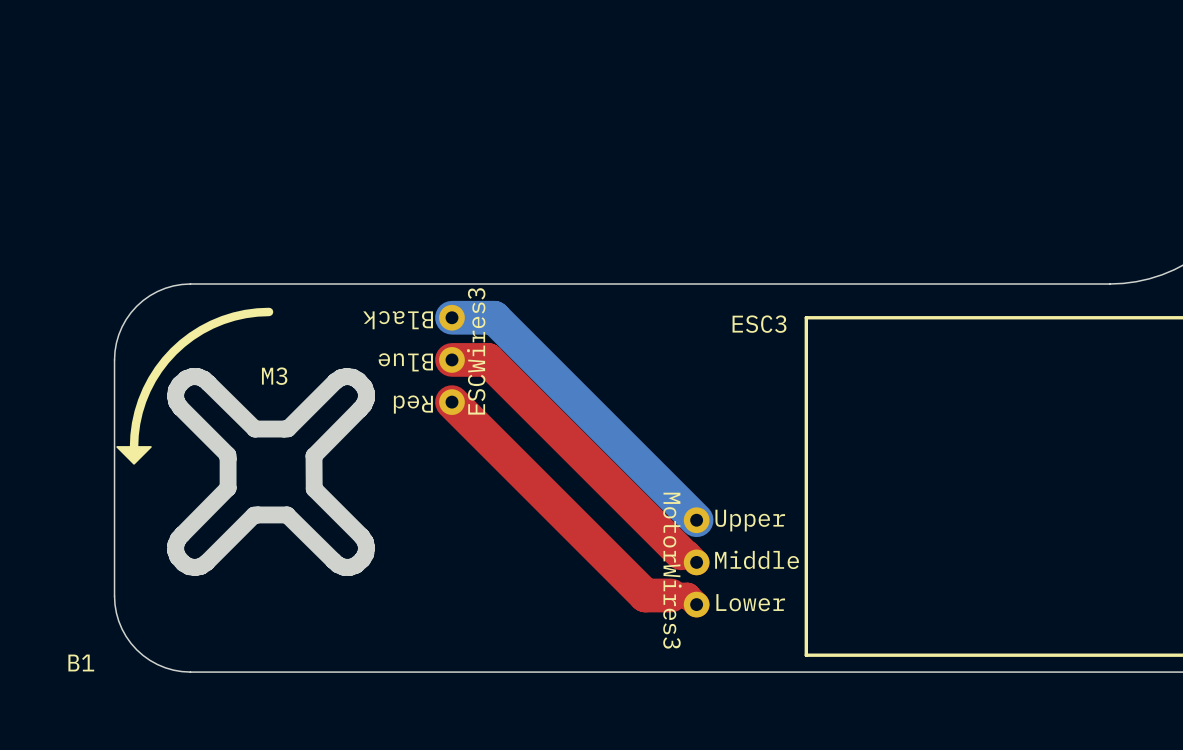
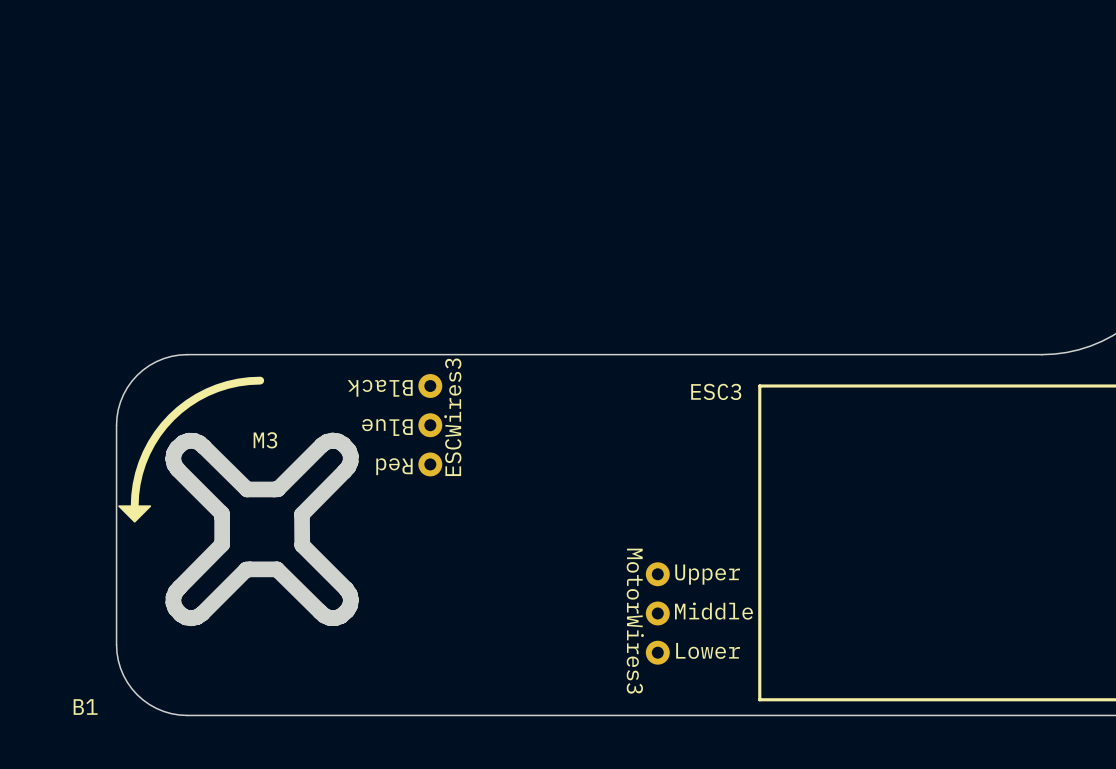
bottom track: (451, 317) (494, 317) (696, 520) -> none
top track: (451, 359) (487, 359) (681, 553) (687, 553) (696, 562) -> none
top track: (451, 402) (645, 595) (687, 595) (696, 604) -> none

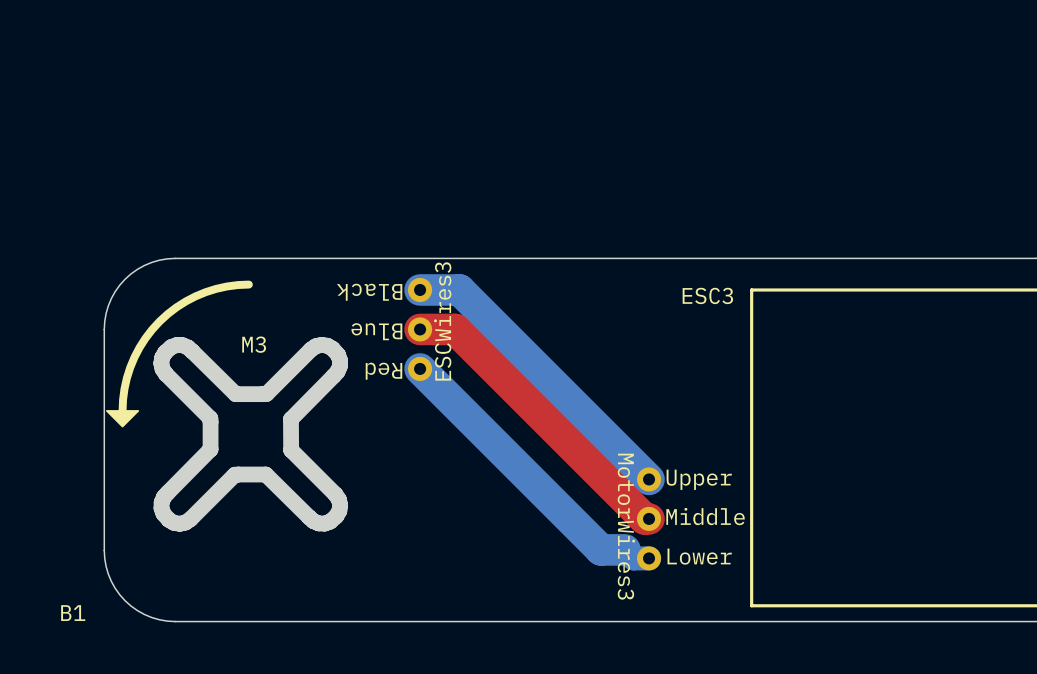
bottom track: none -> (420, 289) (459, 289) (649, 479)
top track: none -> (420, 329) (455, 329) (644, 518) (649, 518)
bottom track: none -> (420, 368) (601, 549) (625, 549) (633, 558) (649, 558)

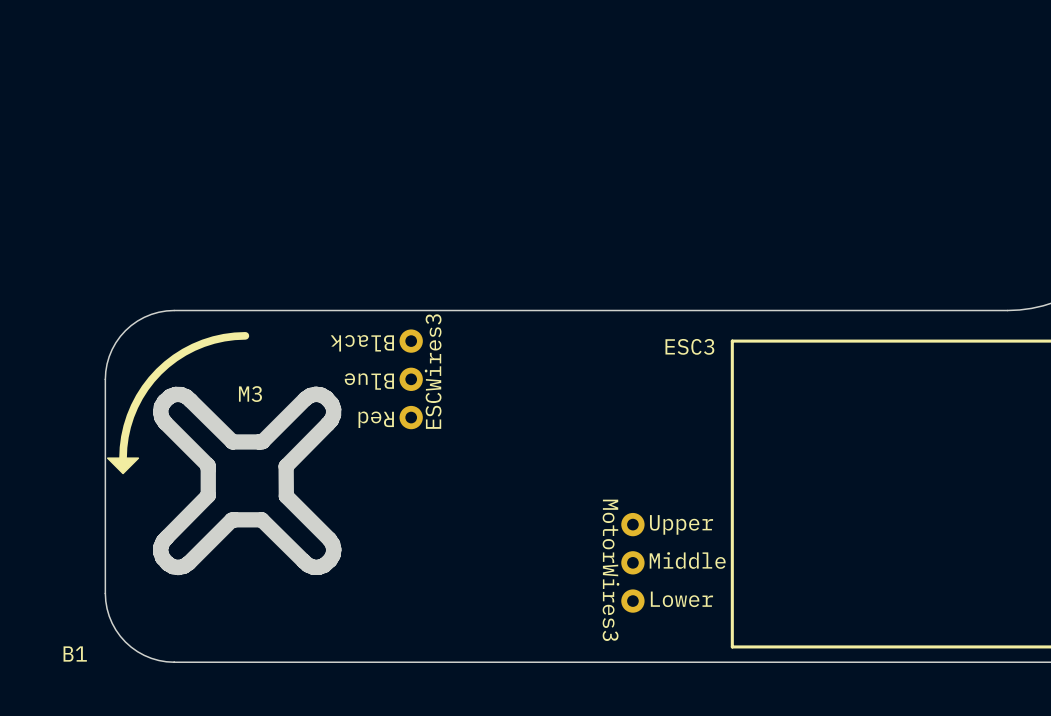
bottom track: (420, 289) (459, 289) (649, 479) -> none
top track: (420, 329) (455, 329) (644, 518) (649, 518) -> none
bottom track: (420, 368) (601, 549) (625, 549) (633, 558) (649, 558) -> none

